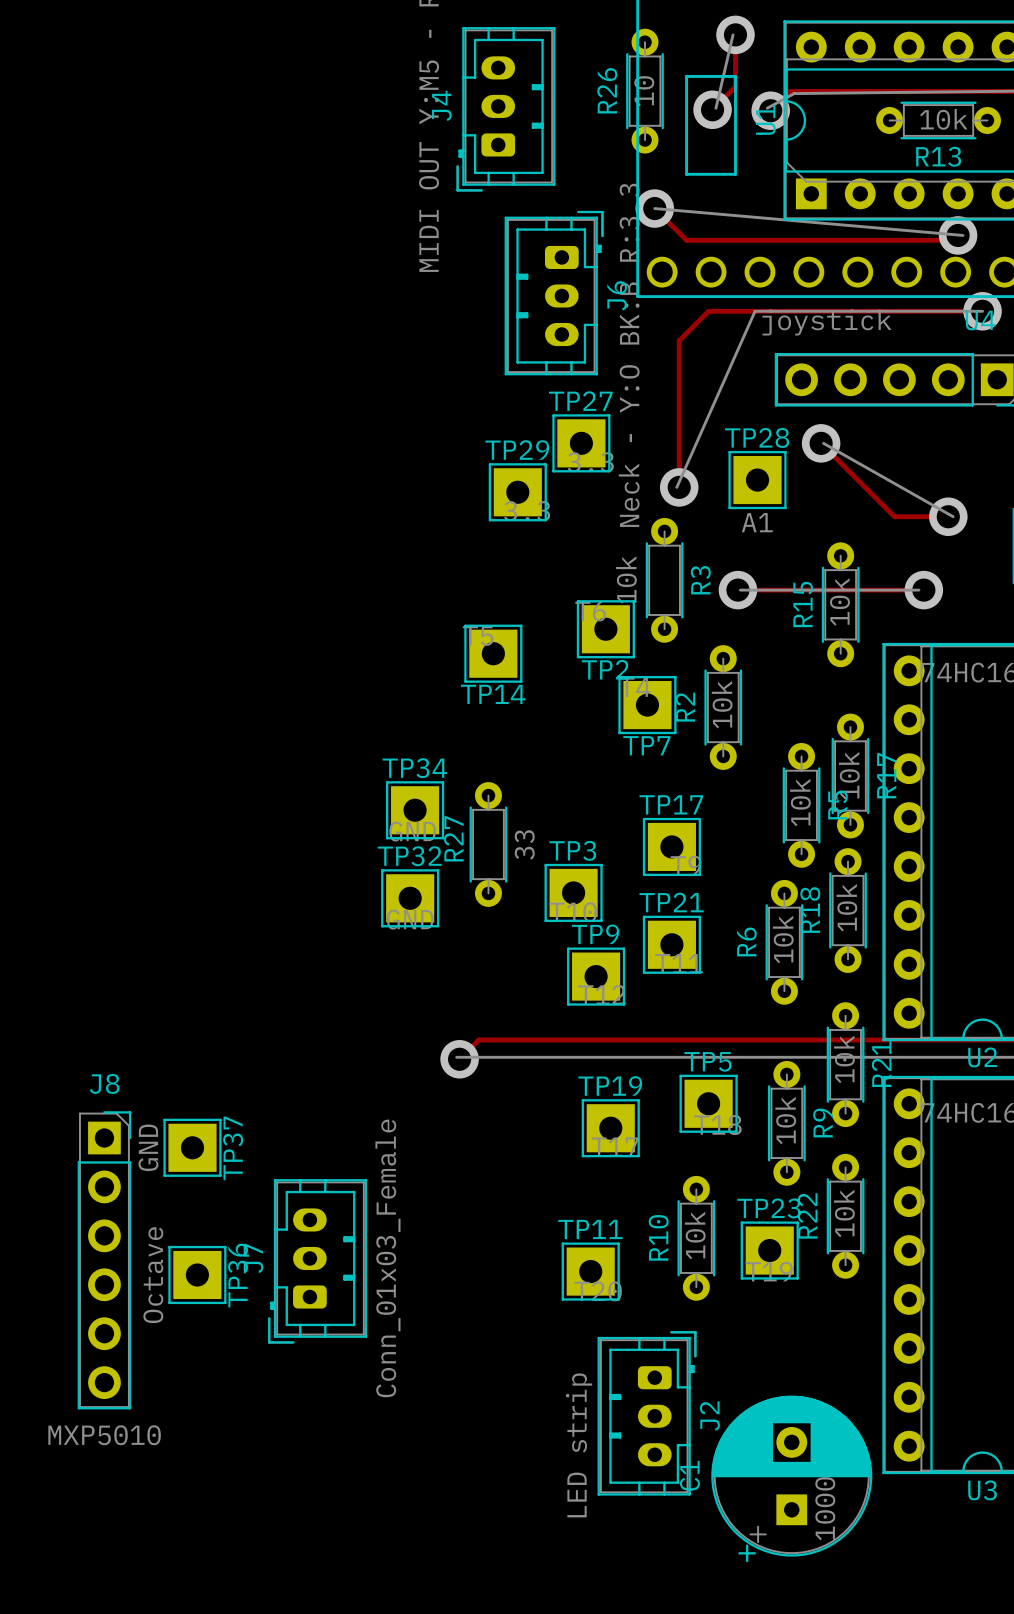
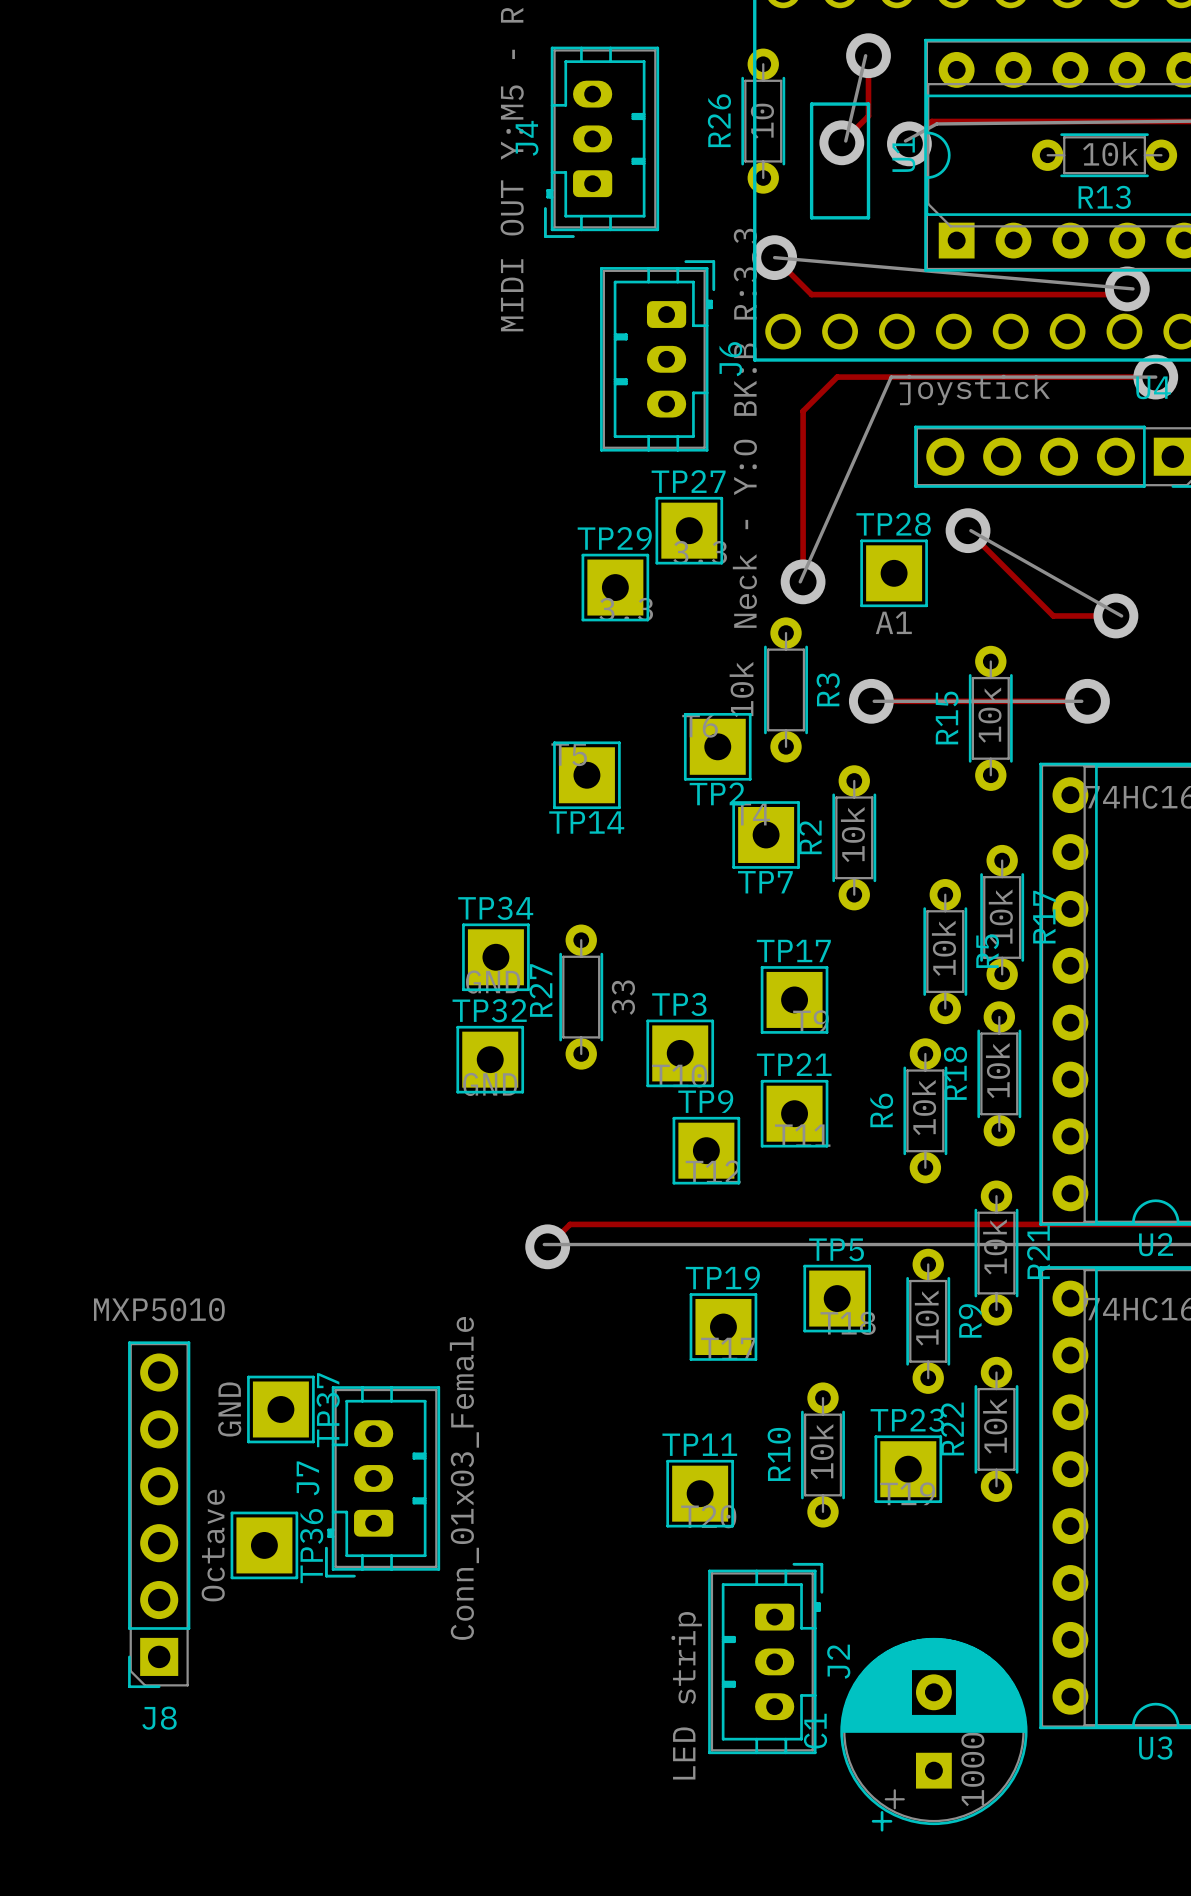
TP37 position: (192, 1147) -> (280, 1409)
J8 rotation: 0° (104, 1260) -> 180° (159, 1514)
TP36 position: (197, 1274) -> (264, 1545)

